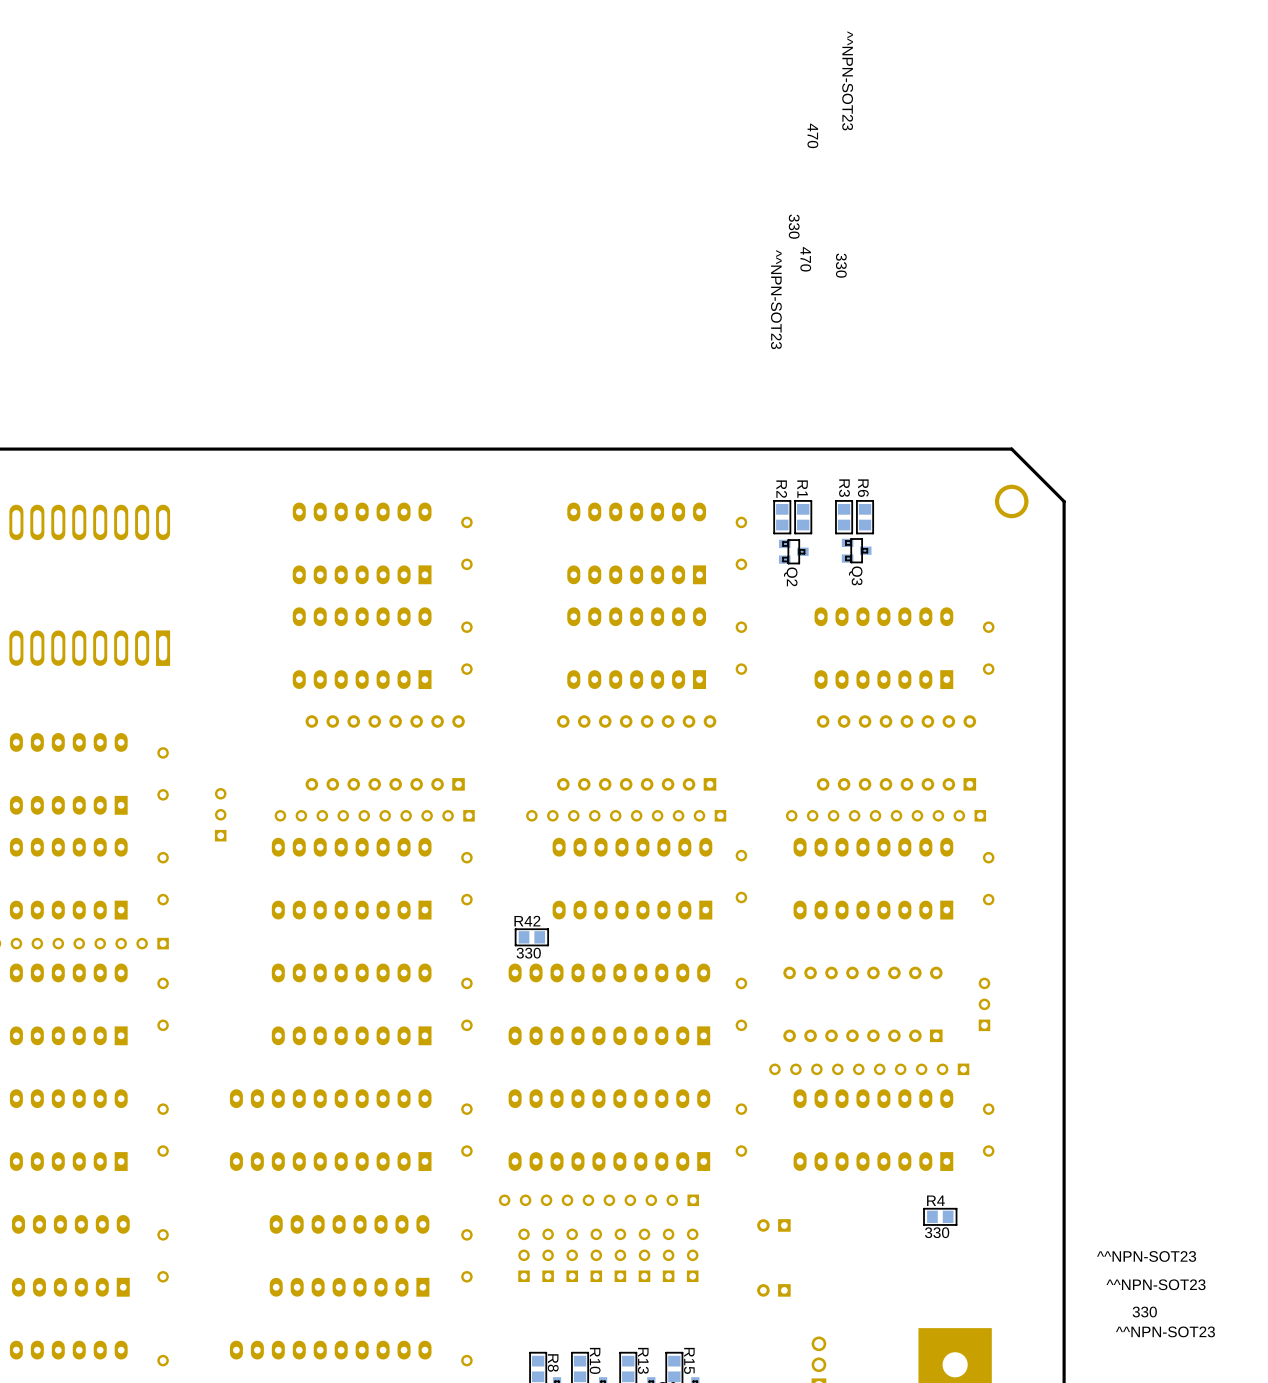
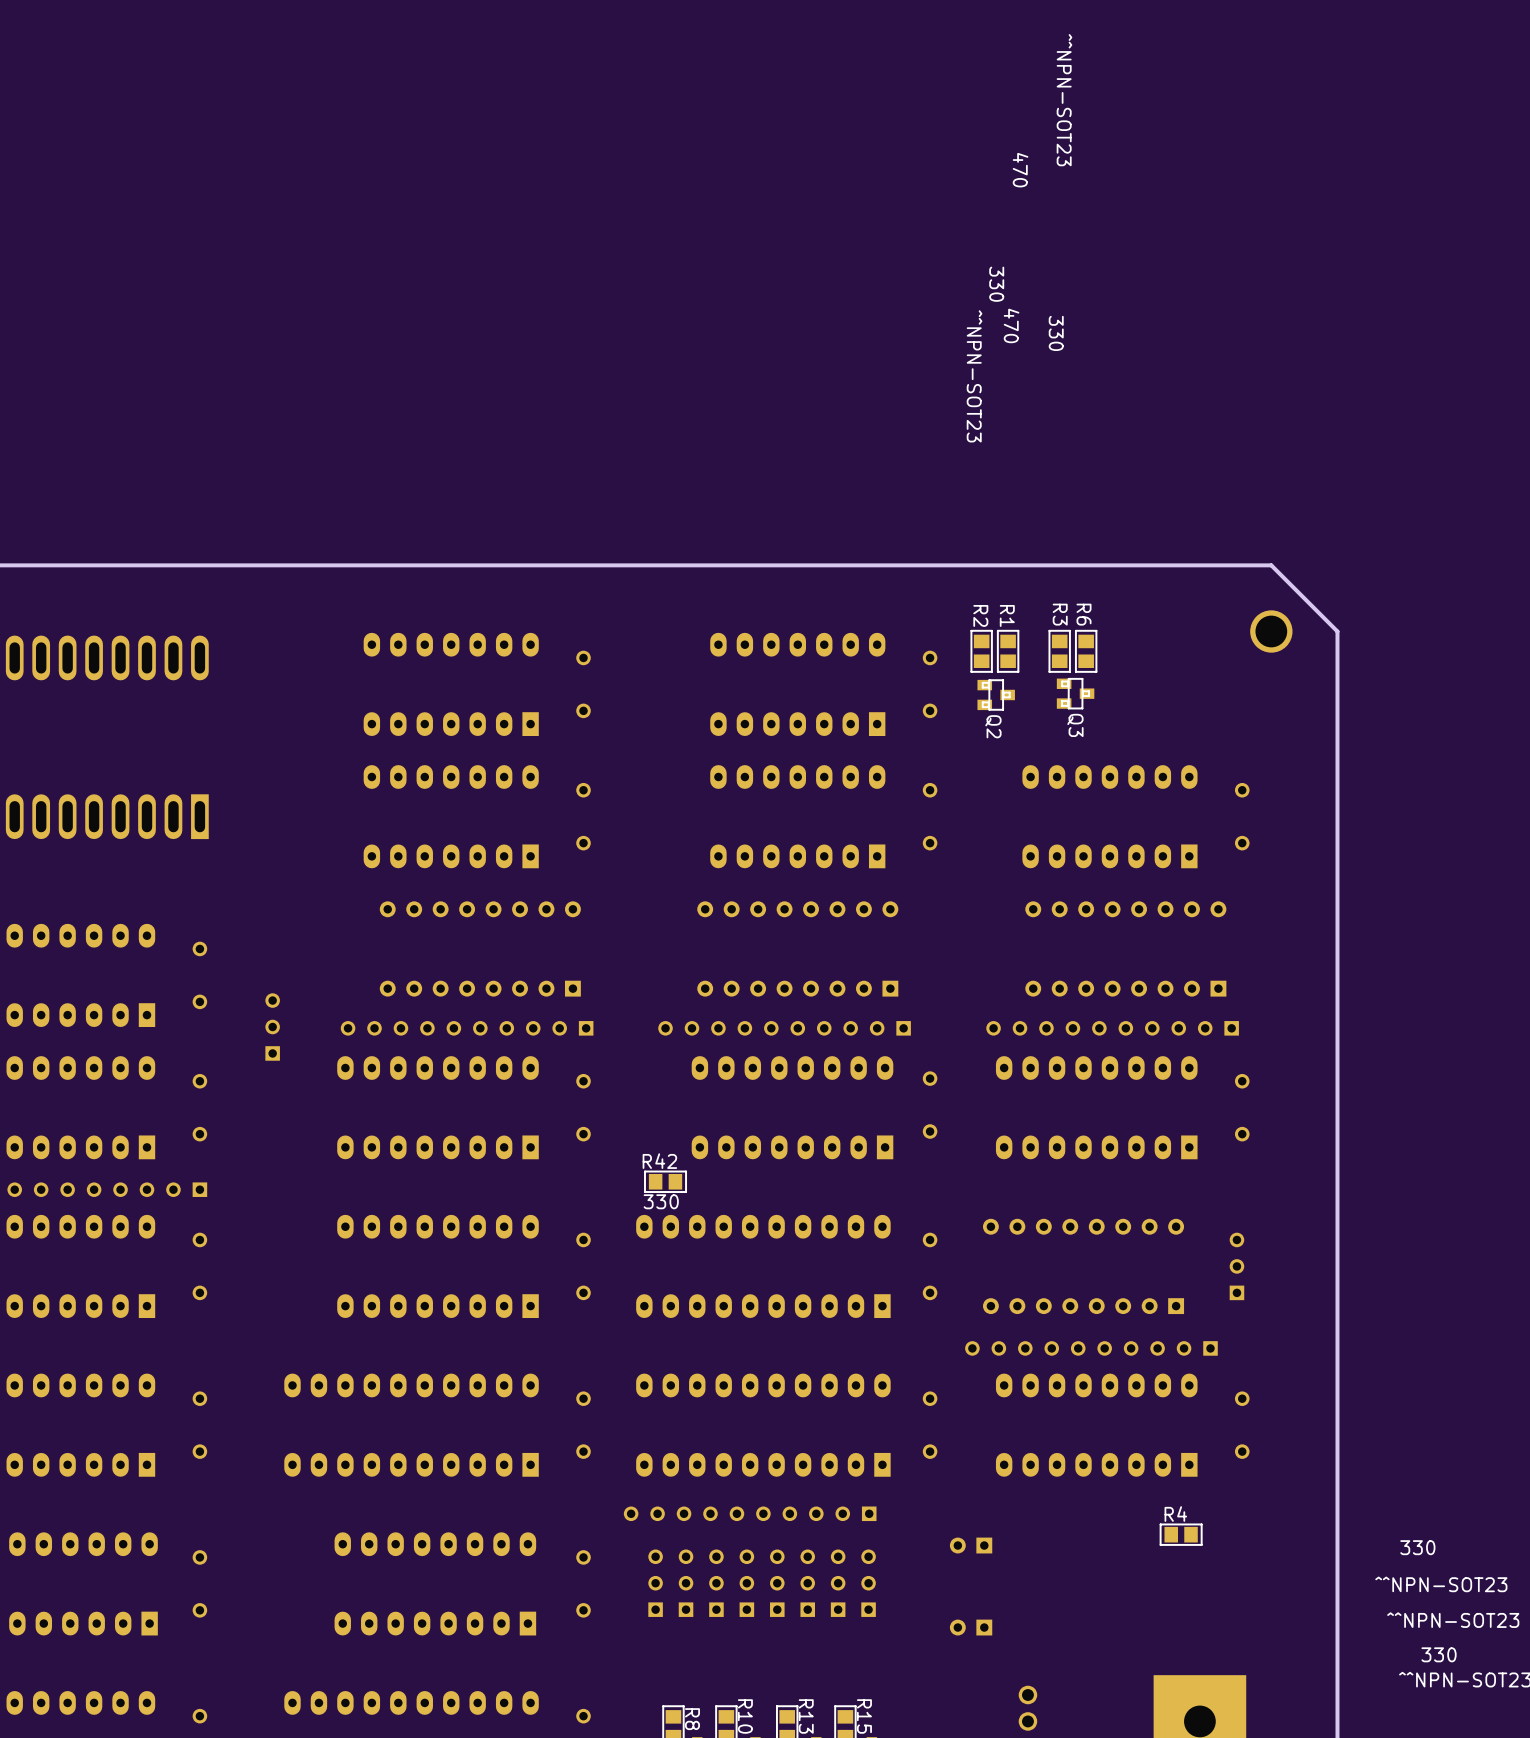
R4 value position: 330 (937, 1232) -> 330 (1417, 1547)

